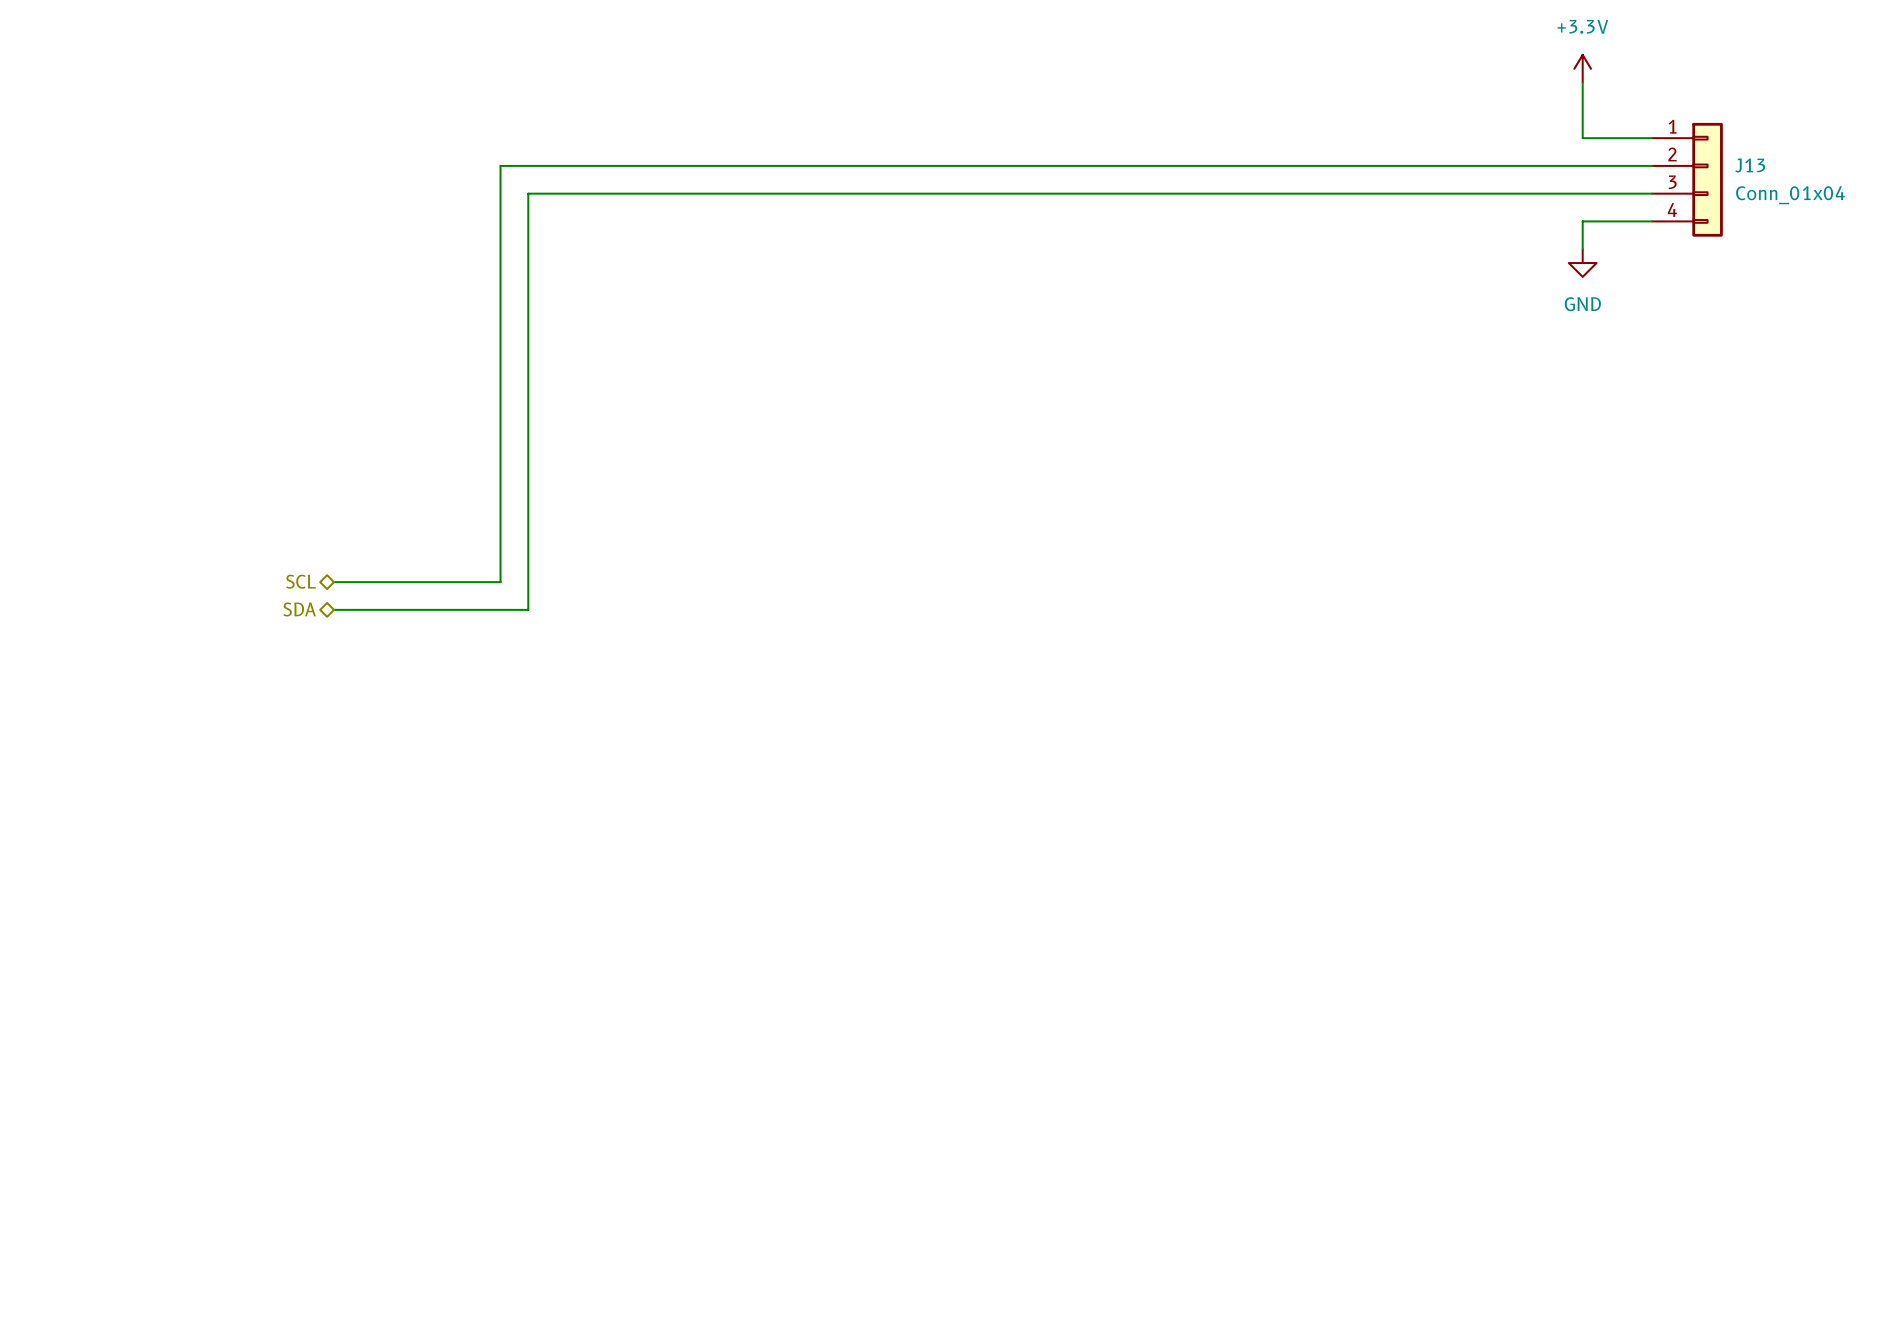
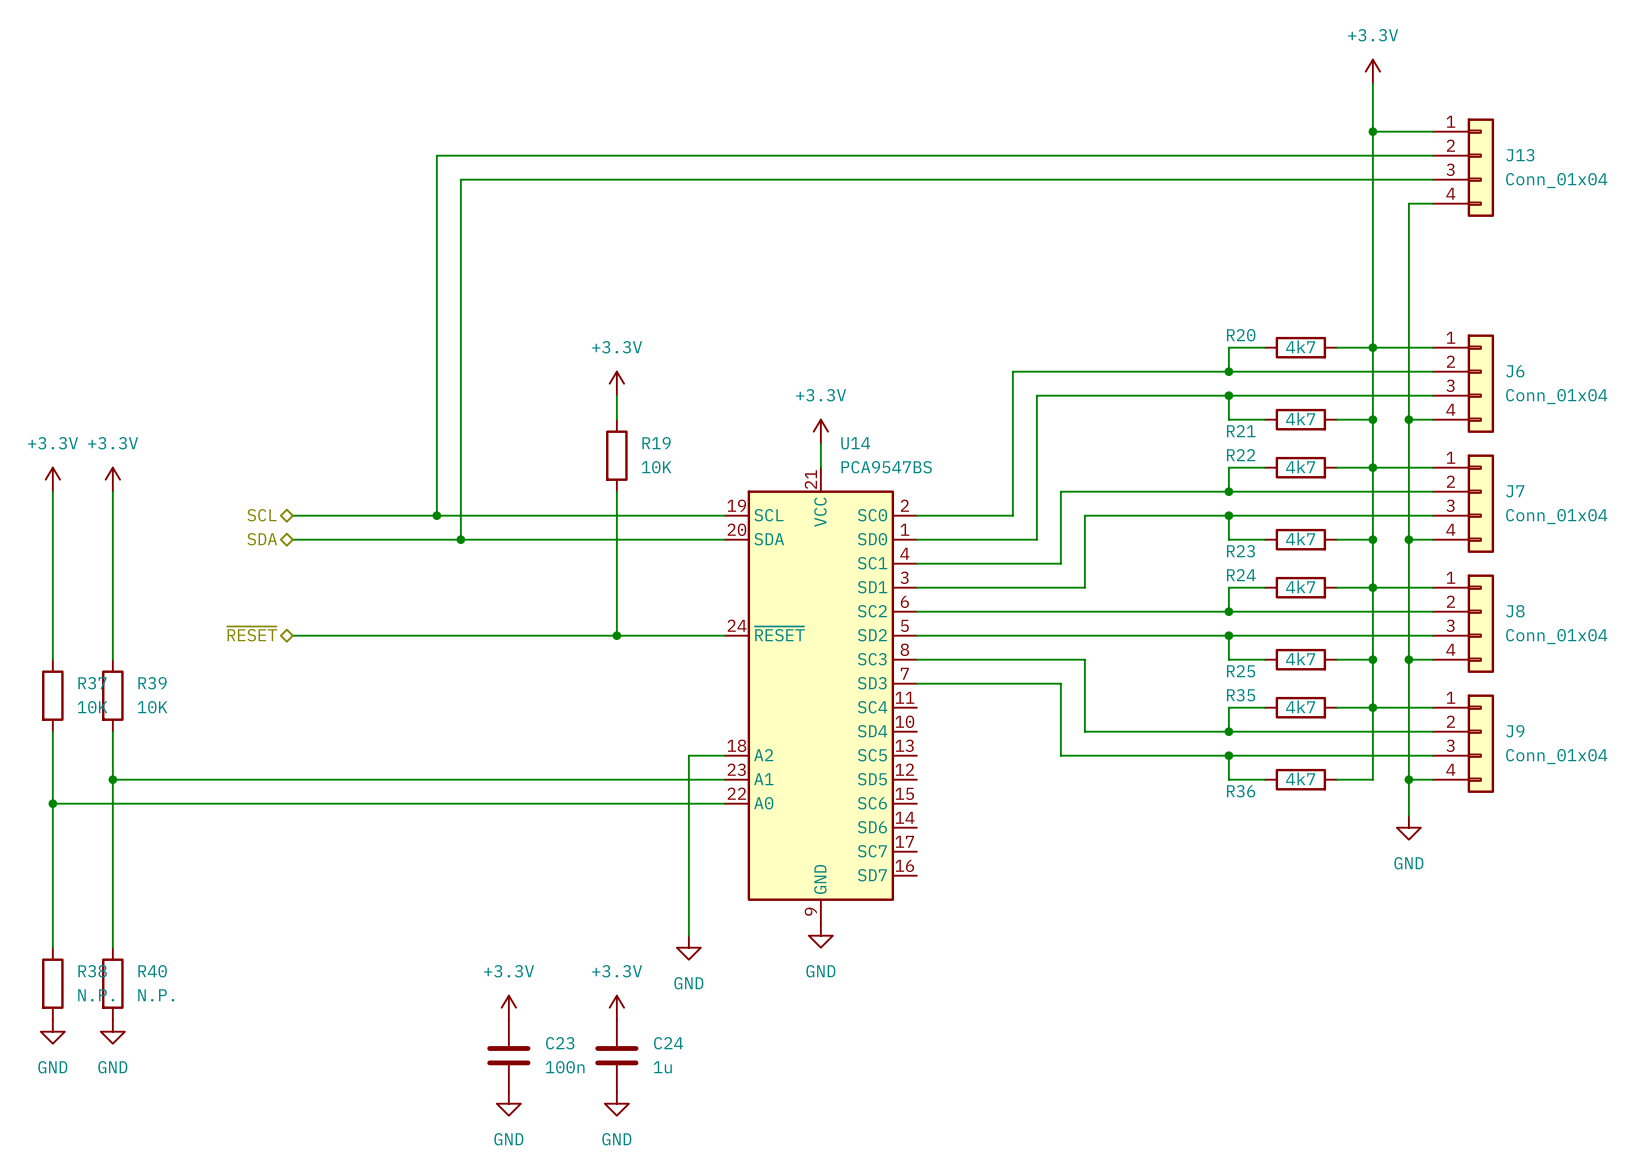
junction: none -> (1372, 131)
wire: (1582, 221) (1624, 221) -> (1372, 203) (1372, 131)
wire: none -> (1408, 203) (1408, 815)
wire: none -> (1372, 227) (1372, 779) (1336, 779)
power symbol: GND (1582, 263) -> none
wire: none -> (1264, 347) (1228, 347) (1228, 371)
R20: none -> 4k7 (1300, 347)
wire: none -> (1336, 347) (1432, 347)
junction: none -> (1372, 347)
junction: none -> (1228, 371)
wire: none -> (1432, 371) (1012, 371) (1012, 515) (916, 515)
power symbol: none -> +3.3V (616, 383)
J6: none -> Conn_01x04 (1463, 383)
wire: none -> (616, 395) (616, 419)
wire: none -> (1228, 395) (1228, 419) (1264, 419)
junction: none -> (1228, 395)
wire: none -> (1432, 395) (1036, 395) (1036, 539) (916, 539)
R21: none -> 4k7 (1300, 419)
wire: none -> (1336, 419) (1372, 419)
junction: none -> (1372, 419)
wire: none -> (1408, 419) (1432, 419)
junction: none -> (1408, 419)
power symbol: none -> +3.3V (820, 431)
wire: none -> (820, 443) (820, 467)
R19: none -> 10K (616, 455)
wire: none -> (1264, 467) (1228, 467) (1228, 491)
R22: none -> 4k7 (1300, 467)
wire: none -> (1336, 467) (1432, 467)
junction: none -> (1372, 467)
power symbol: none -> +3.3V (52, 479)
power symbol: none -> +3.3V (112, 479)
wire: none -> (52, 491) (52, 659)
wire: none -> (112, 491) (112, 659)
wire: none -> (616, 491) (616, 635)
junction: none -> (1228, 491)
wire: none -> (1432, 491) (1060, 491) (1060, 563) (916, 563)
J7: none -> Conn_01x04 (1463, 503)
wire: none -> (436, 515) (724, 515)
junction: none -> (436, 515)
wire: none -> (1228, 515) (1228, 539) (1264, 539)
junction: none -> (1228, 515)
wire: none -> (1432, 515) (1084, 515) (1084, 587) (916, 587)
wire: none -> (460, 539) (724, 539)
junction: none -> (460, 539)
R23: none -> 4k7 (1300, 539)
wire: none -> (1336, 539) (1372, 539)
junction: none -> (1372, 539)
wire: none -> (1408, 539) (1432, 539)
junction: none -> (1408, 539)
wire: none -> (1264, 587) (1228, 587) (1228, 611)
R24: none -> 4k7 (1300, 587)
wire: none -> (1336, 587) (1432, 587)
junction: none -> (1372, 587)
wire: none -> (916, 611) (1432, 611)
junction: none -> (1228, 611)
J8: none -> Conn_01x04 (1463, 623)
hierarchical label: none -> ~{RESET} (252, 633)
wire: none -> (292, 635) (724, 635)
junction: none -> (616, 635)
wire: none -> (916, 635) (1432, 635)
wire: none -> (1228, 635) (1228, 659) (1264, 659)
junction: none -> (1228, 635)
wire: none -> (916, 659) (1084, 659) (1084, 731) (1432, 731)
R25: none -> 4k7 (1300, 659)
wire: none -> (1336, 659) (1372, 659)
junction: none -> (1372, 659)
wire: none -> (1408, 659) (1432, 659)
junction: none -> (1408, 659)
wire: none -> (916, 683) (1060, 683) (1060, 755) (1432, 755)
R37: none -> 10K (52, 695)
R39: none -> 10K (112, 695)
U14: none -> PCA9547BS (820, 695)
wire: none -> (1264, 707) (1228, 707) (1228, 731)
R35: none -> 4k7 (1300, 707)
wire: none -> (1336, 707) (1432, 707)
junction: none -> (1372, 707)
wire: none -> (52, 731) (52, 947)
wire: none -> (112, 731) (112, 947)
junction: none -> (1228, 731)
J9: none -> Conn_01x04 (1463, 743)
wire: none -> (724, 755) (688, 755) (688, 935)
wire: none -> (1228, 755) (1228, 779) (1264, 779)
junction: none -> (1228, 755)
wire: none -> (112, 779) (724, 779)
junction: none -> (112, 779)
R36: none -> 4k7 (1300, 779)
wire: none -> (1408, 779) (1432, 779)
junction: none -> (1408, 779)
wire: none -> (52, 803) (724, 803)
junction: none -> (52, 803)
power symbol: none -> GND (1408, 827)
power symbol: none -> GND (820, 935)
power symbol: none -> GND (688, 947)
R38: none -> N.P. (52, 983)
R40: none -> N.P. (112, 983)
power symbol: none -> +3.3V (508, 1007)
power symbol: none -> +3.3V (616, 1007)
power symbol: none -> GND (52, 1031)
power symbol: none -> GND (112, 1031)
C23: none -> 100n (508, 1055)
C24: none -> 1u (616, 1055)
power symbol: none -> GND (508, 1103)
power symbol: none -> GND (616, 1103)

